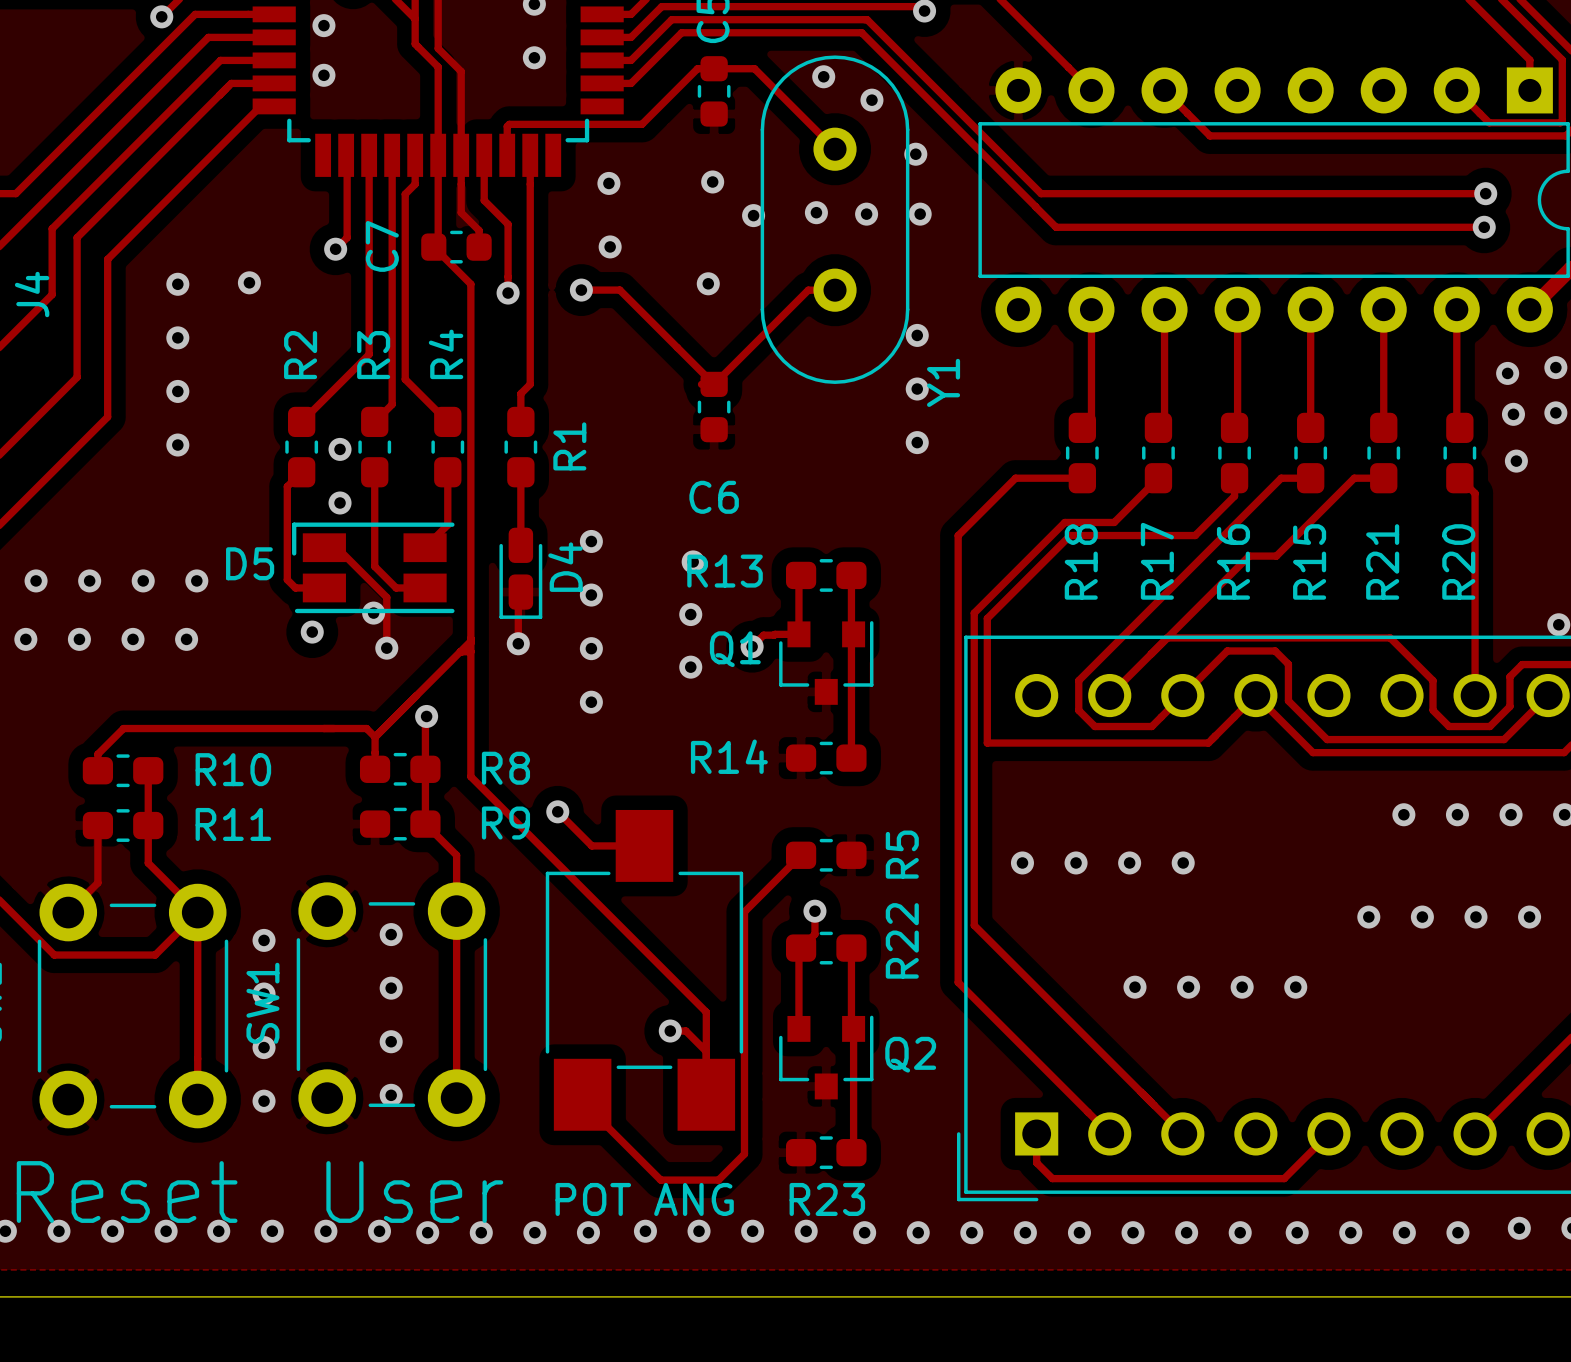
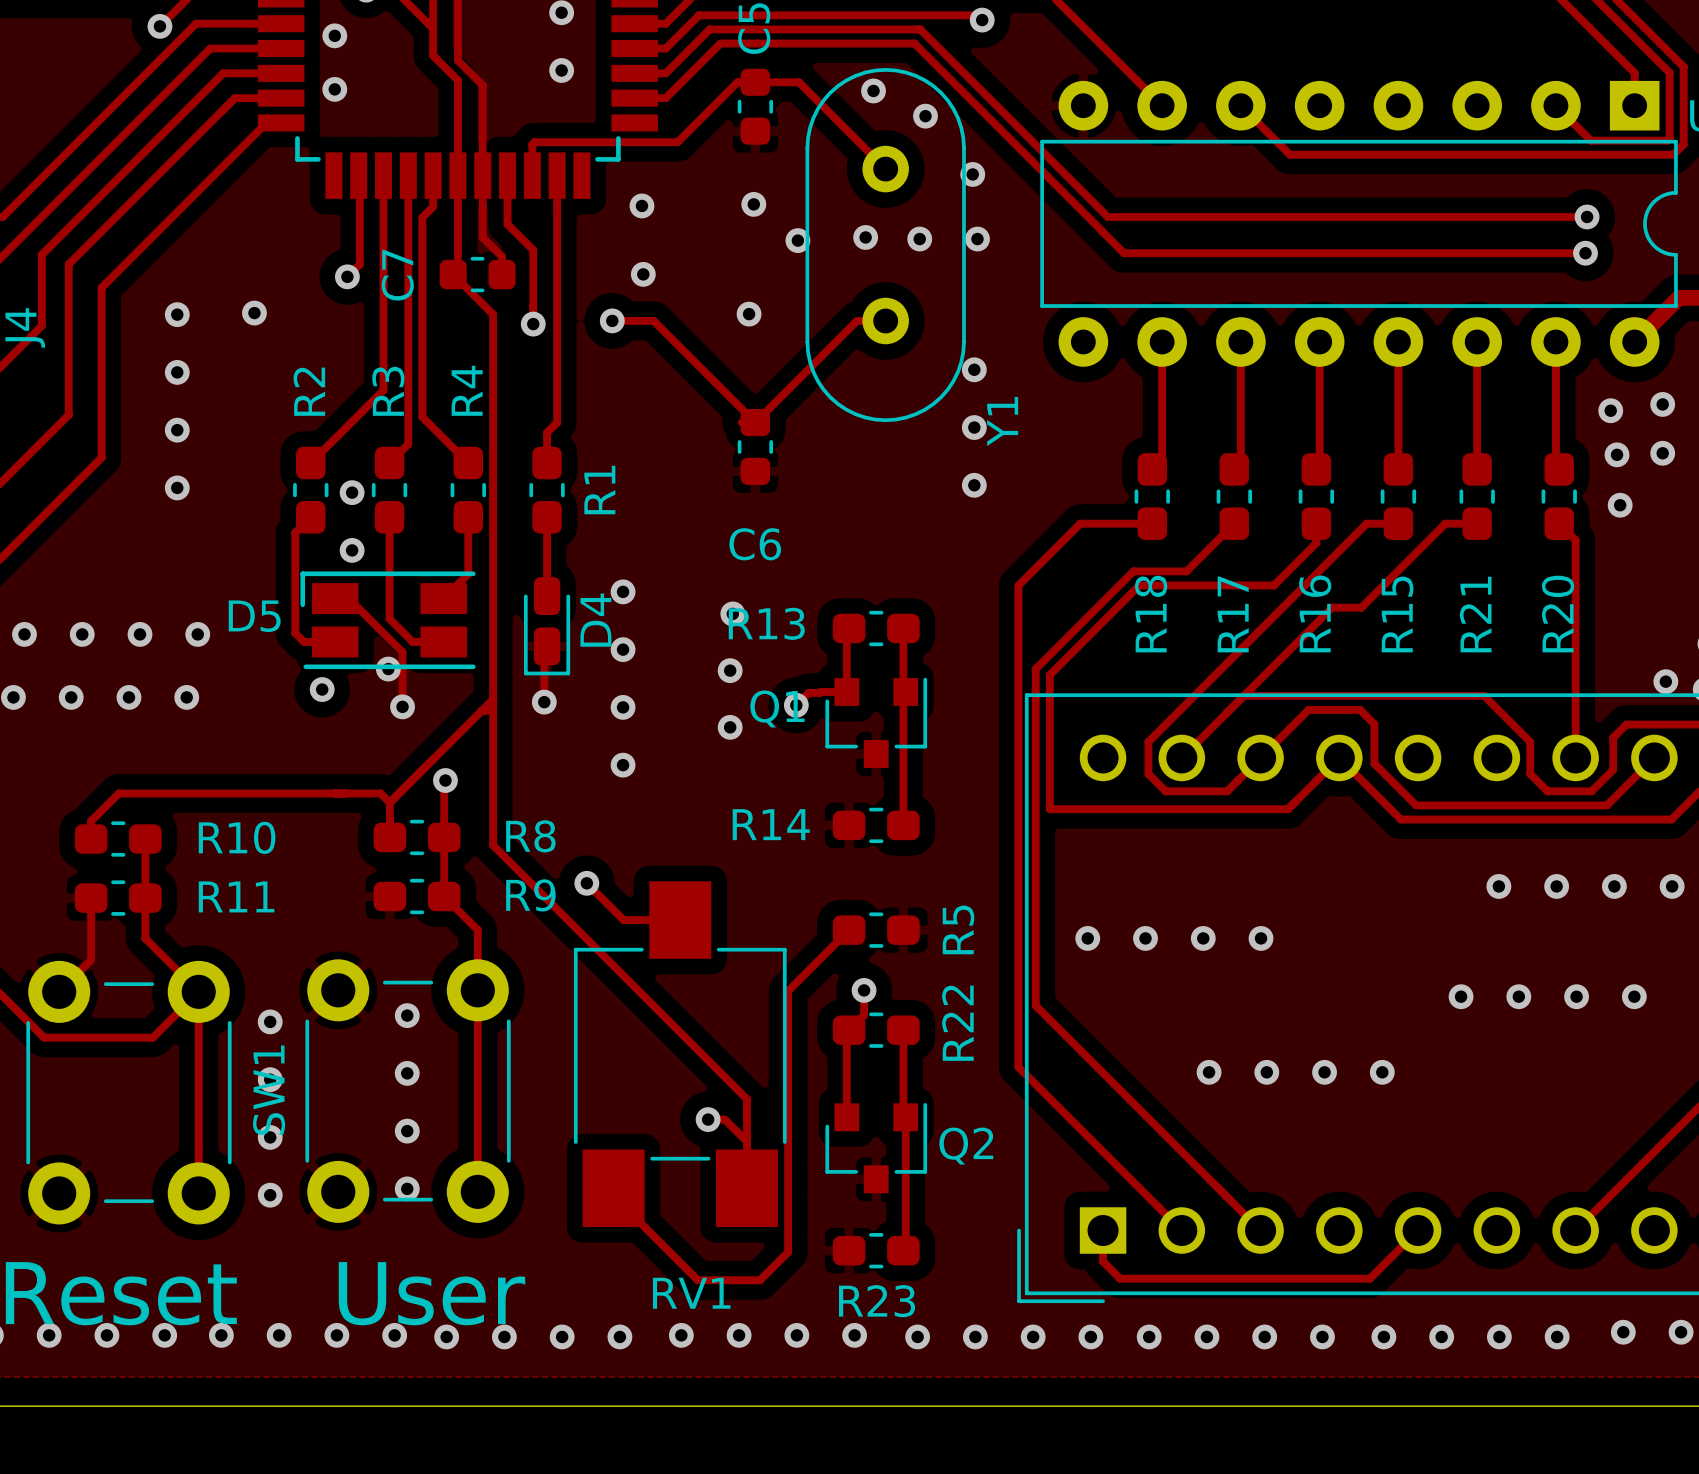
RV1 name: none -> RV1 (691, 1293)
text: POT ANG (644, 1199) -> none

